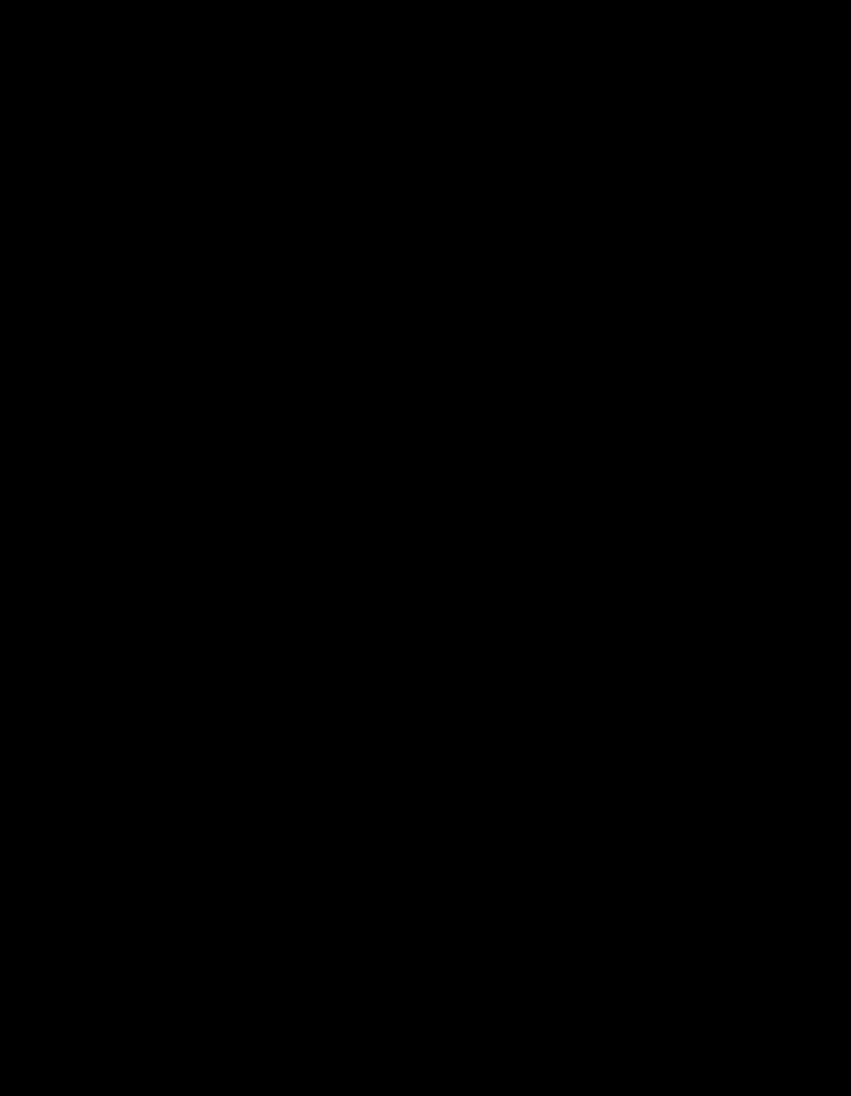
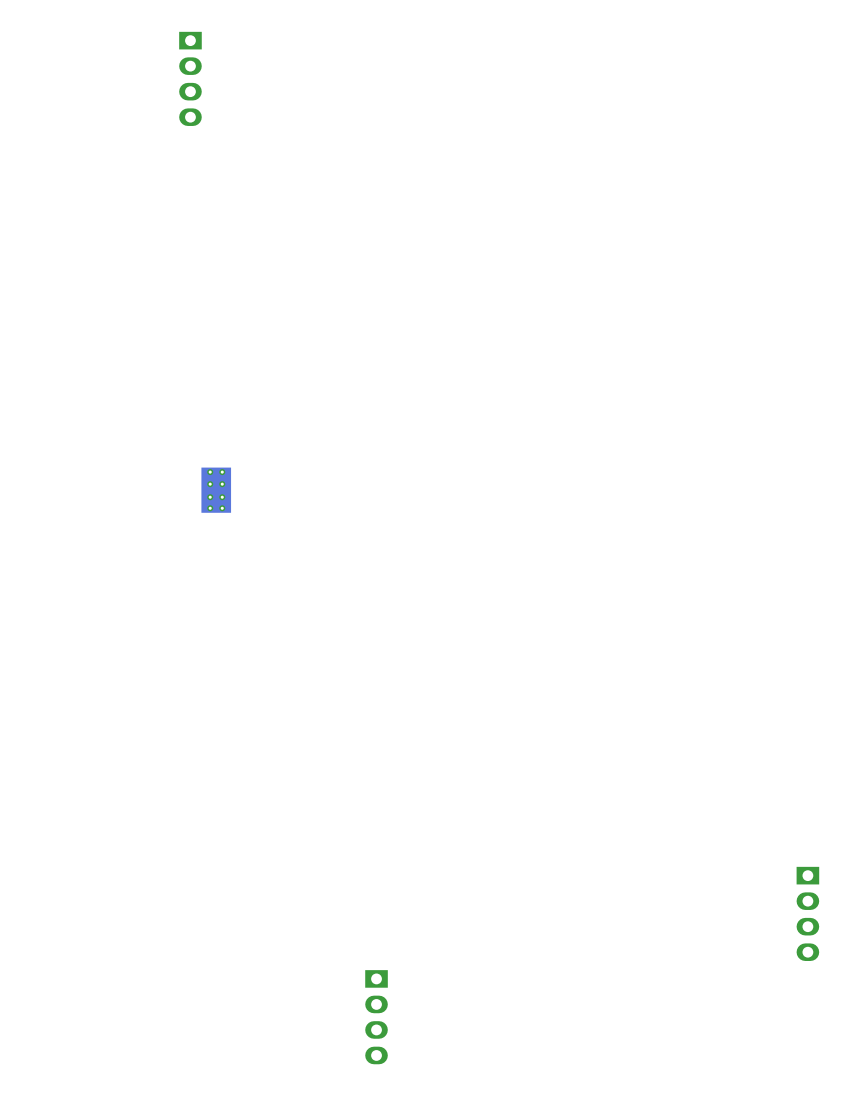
part: none -> (190, 78)
part: none -> (216, 490)
part: none -> (807, 913)
part: none -> (376, 1017)

